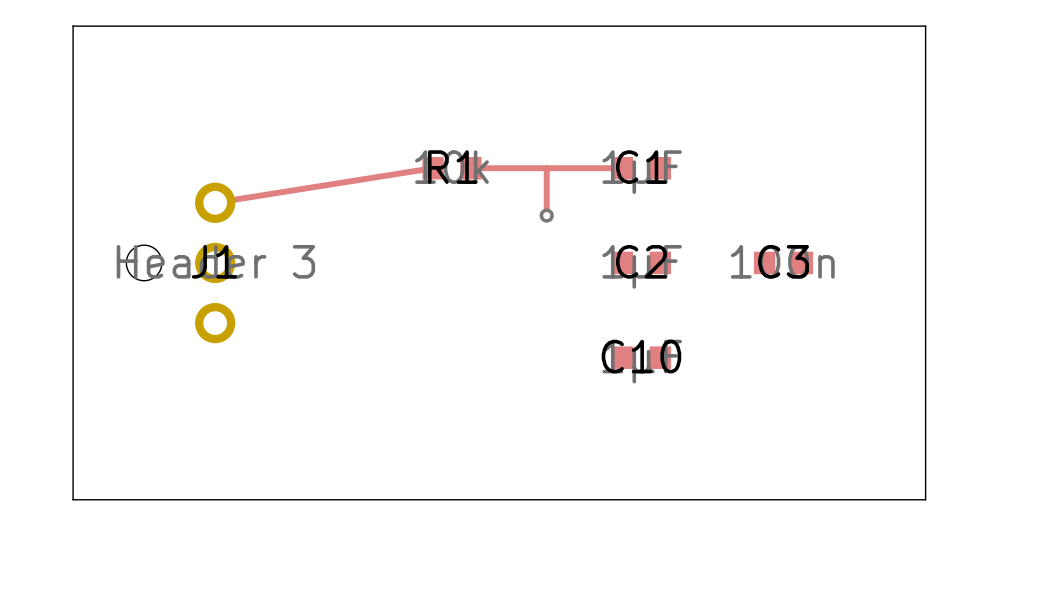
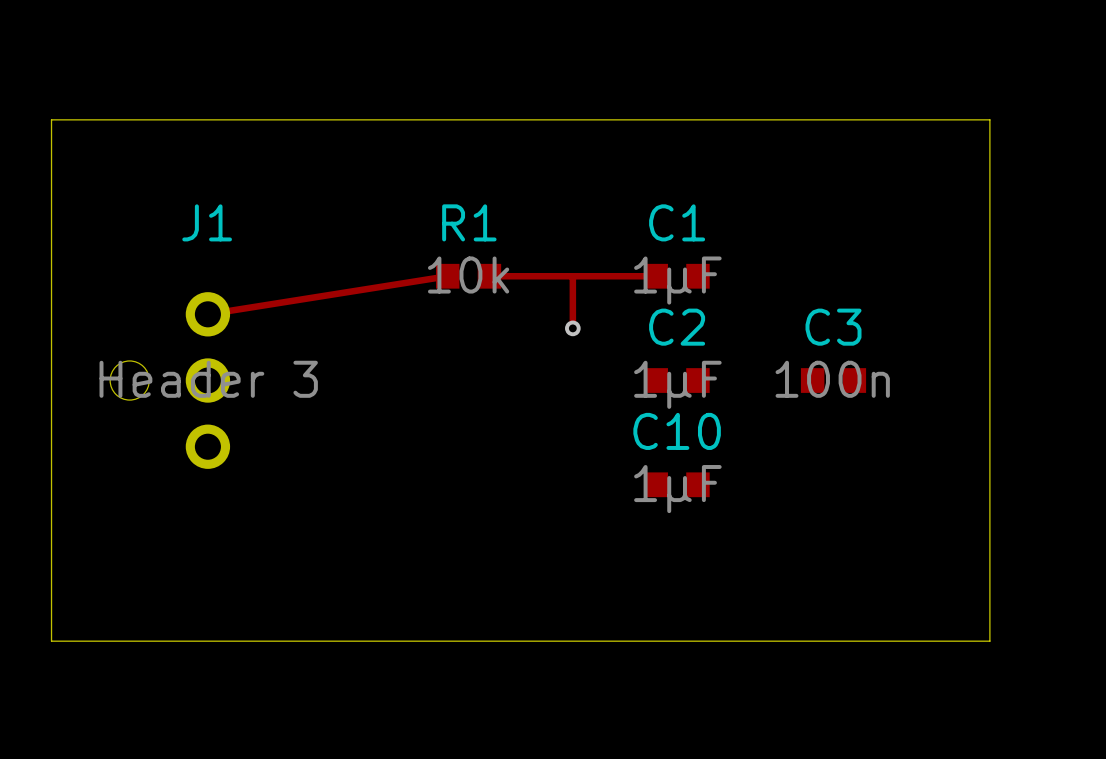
R1 name position: R1 (452, 167) -> R1 (469, 222)
C1 name position: C1 (641, 167) -> C1 (677, 222)
J1 name position: J1 (214, 261) -> J1 (207, 222)
C2 name position: C2 (641, 261) -> C2 (677, 327)
C3 name position: C3 (783, 261) -> C3 (833, 327)
C10 name position: C10 (641, 356) -> C10 (677, 431)

